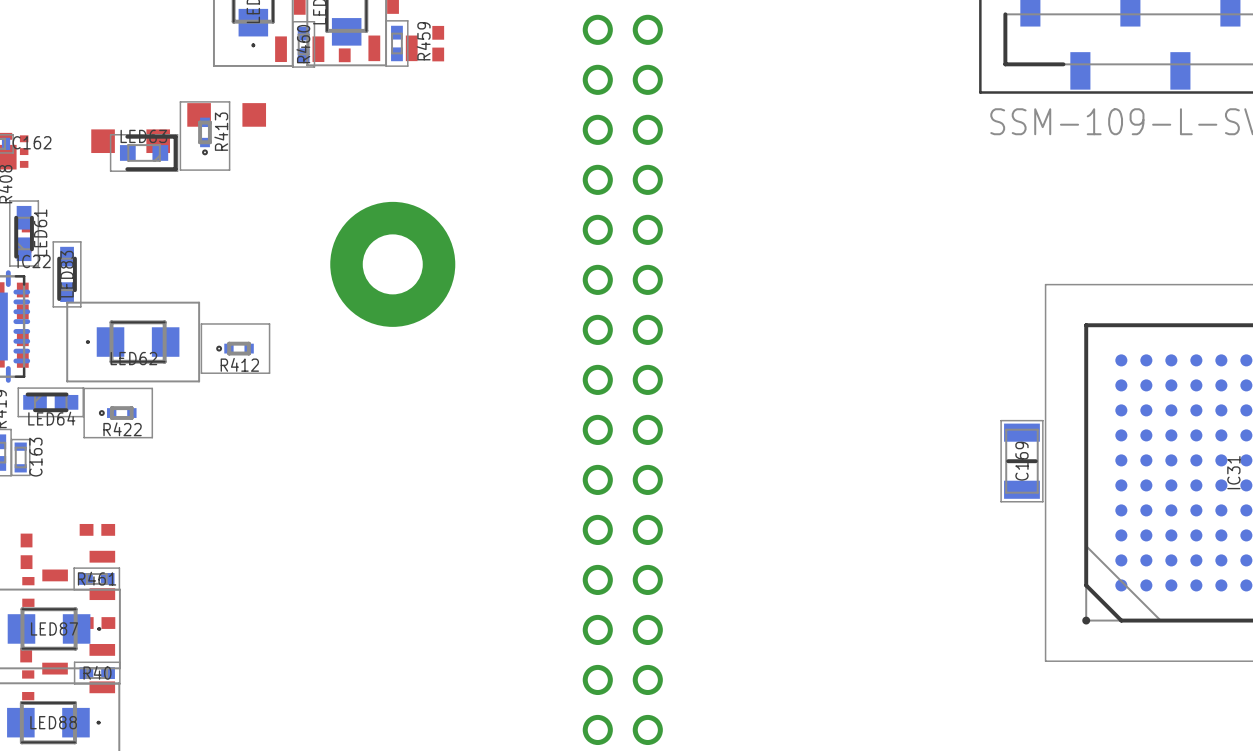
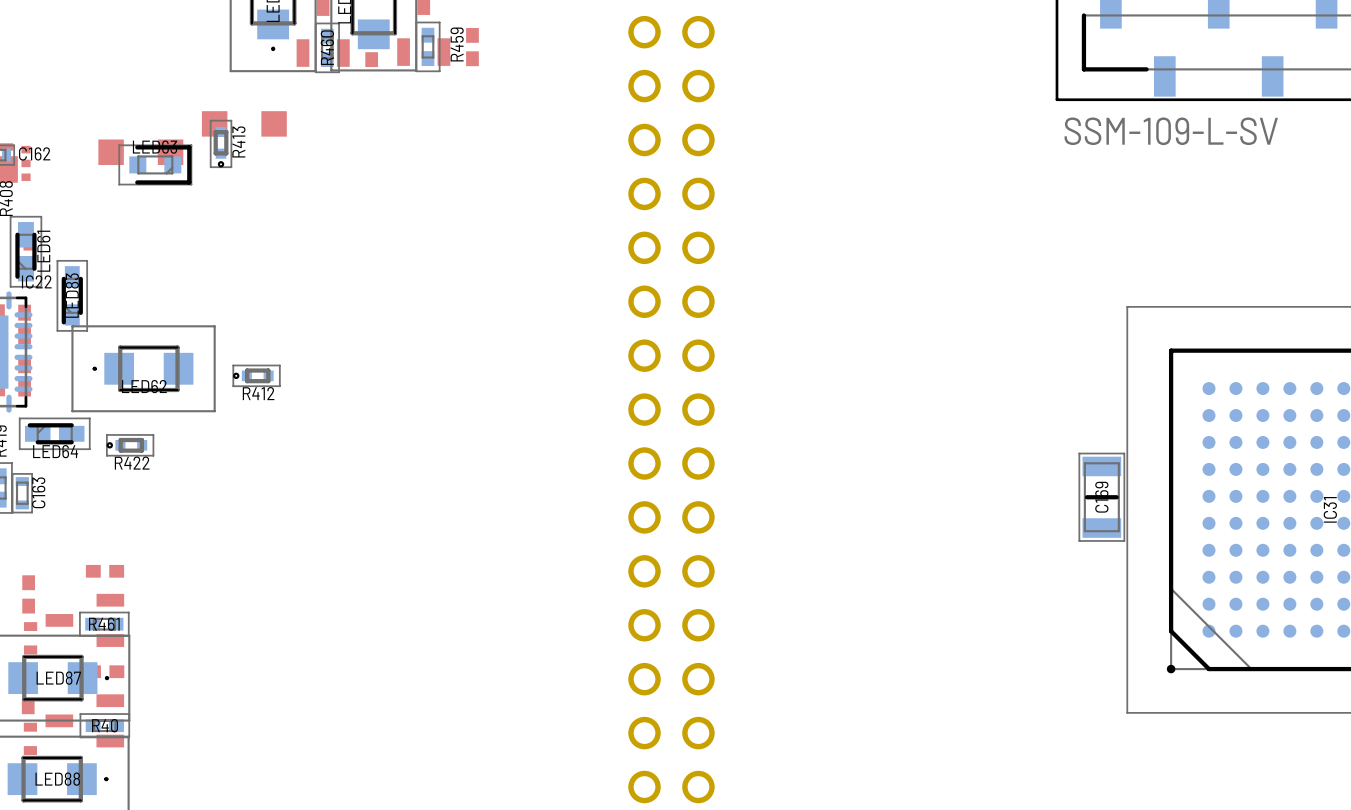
R413 footprint: [179, 101, 231, 171] -> [210, 120, 232, 168]
part: (392, 264) -> none
R412 footprint: [200, 323, 271, 374] -> [232, 364, 281, 387]
R422 footprint: [83, 387, 153, 439] -> [106, 434, 154, 457]

